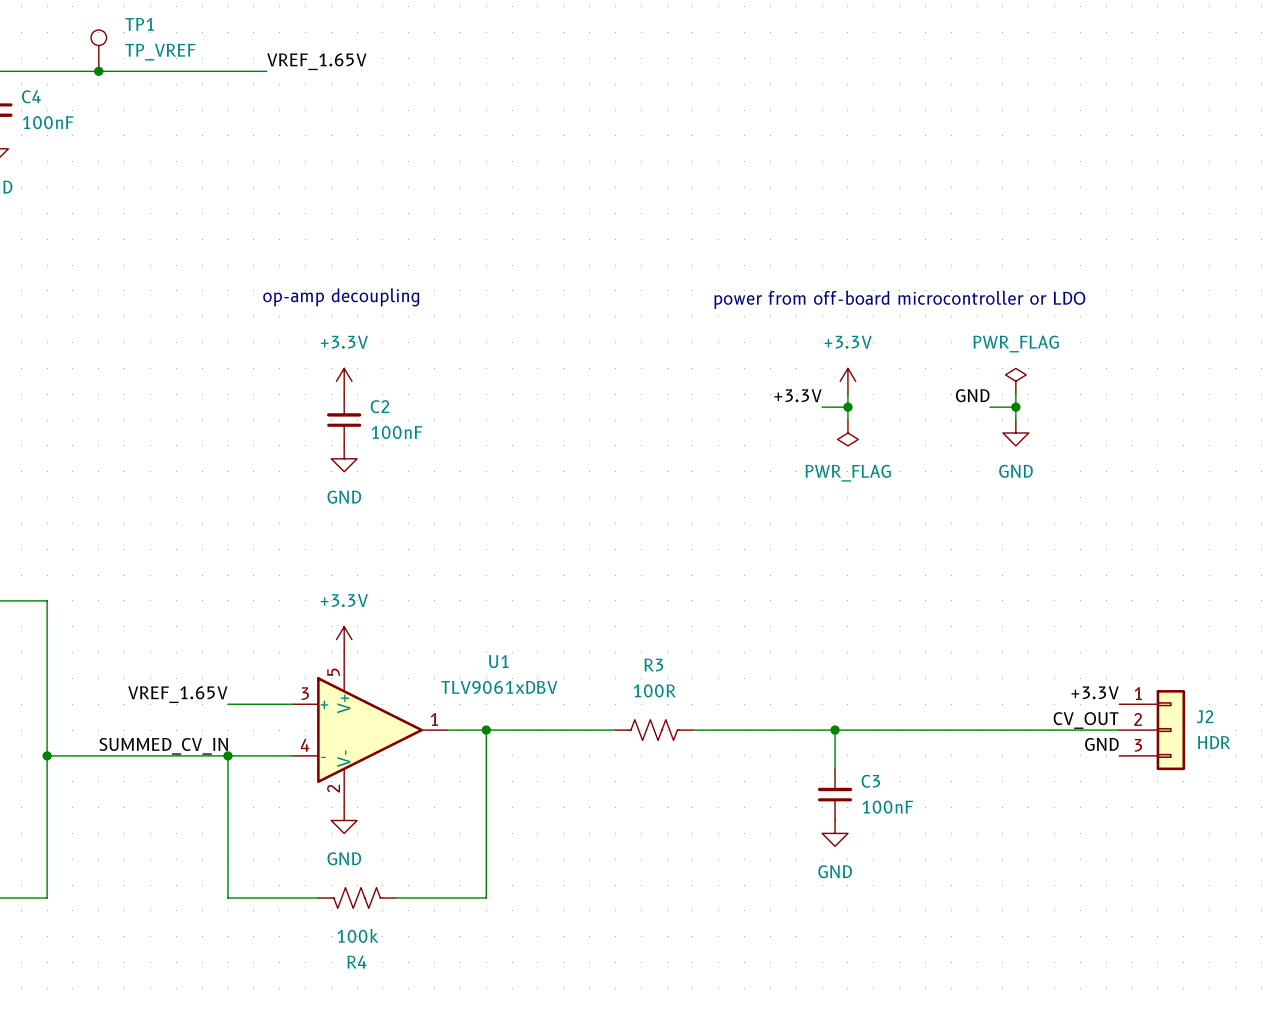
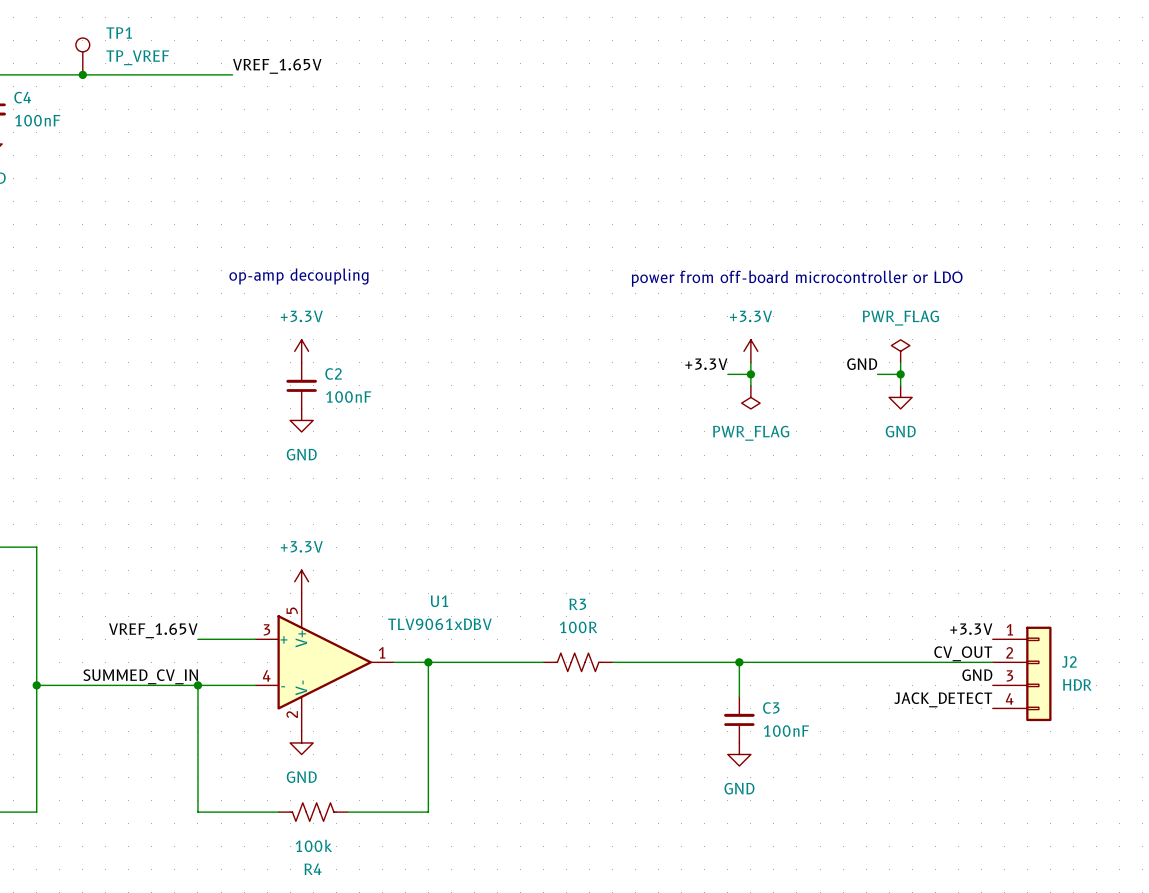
J2 symbol: [1119, 690, 1186, 771] -> [992, 626, 1052, 722]
label: none -> JACK_DETECT (943, 699)

